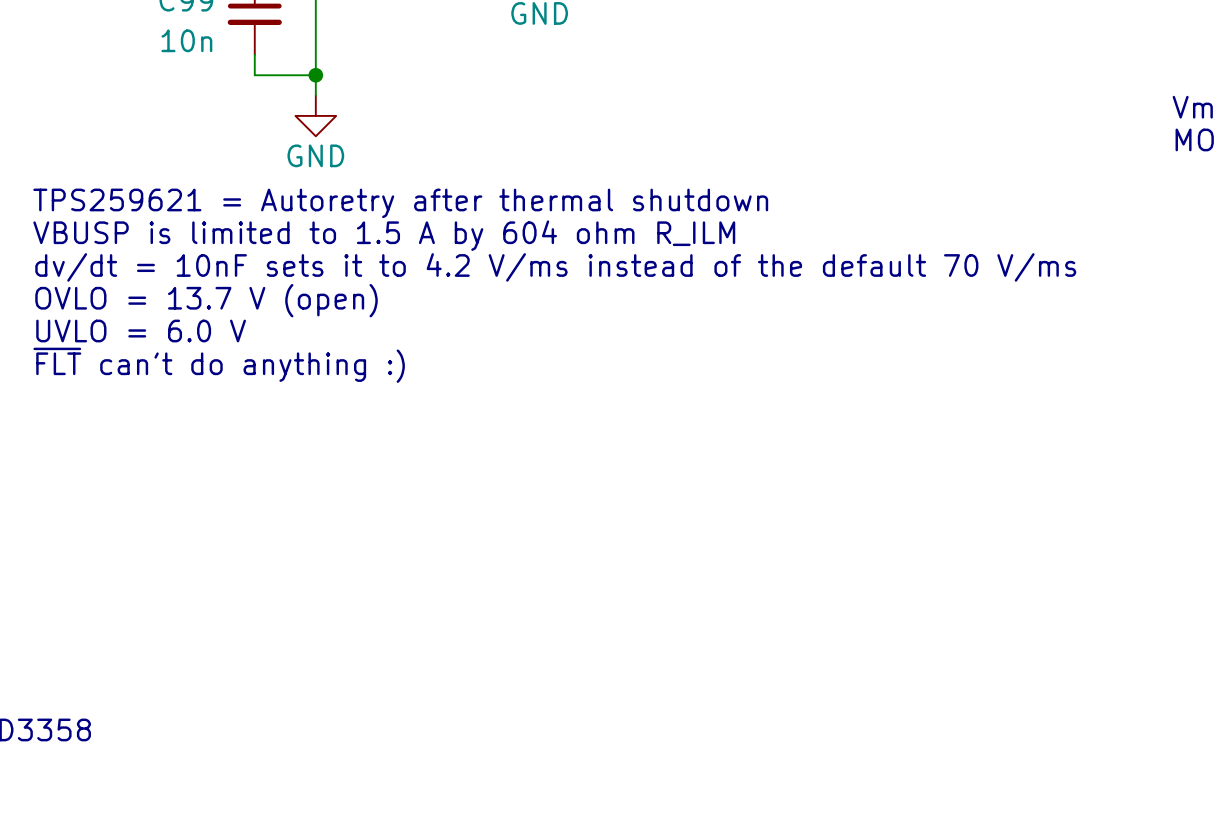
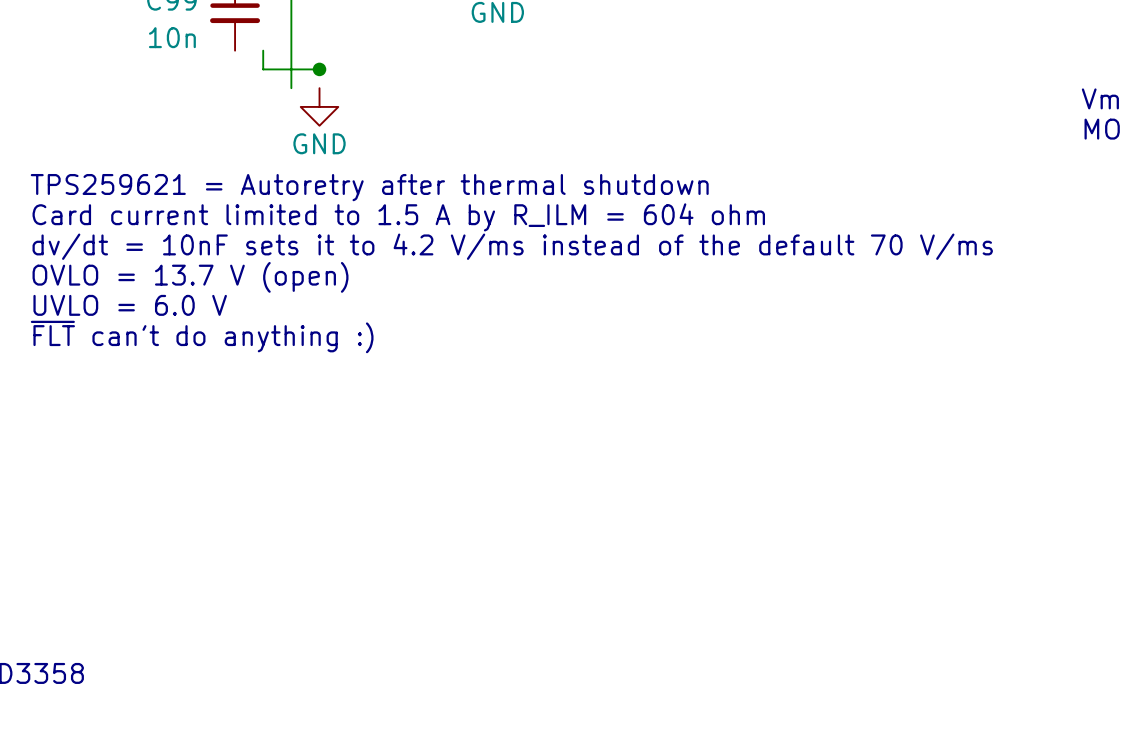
wire: (254, 54) (254, 75) (285, 75) -> (263, 50) (263, 69)
wire: none -> (291, 69) (319, 69)
junction position: (315, 75) -> (319, 69)
power symbol position: GND (315, 115) -> GND (319, 106)
text: VBUSP is limited to 1.5 A by 604 ohm R_ILM (384, 235) -> Card current limited to 1.5 A by R_ILM = 604 ohm (398, 217)

